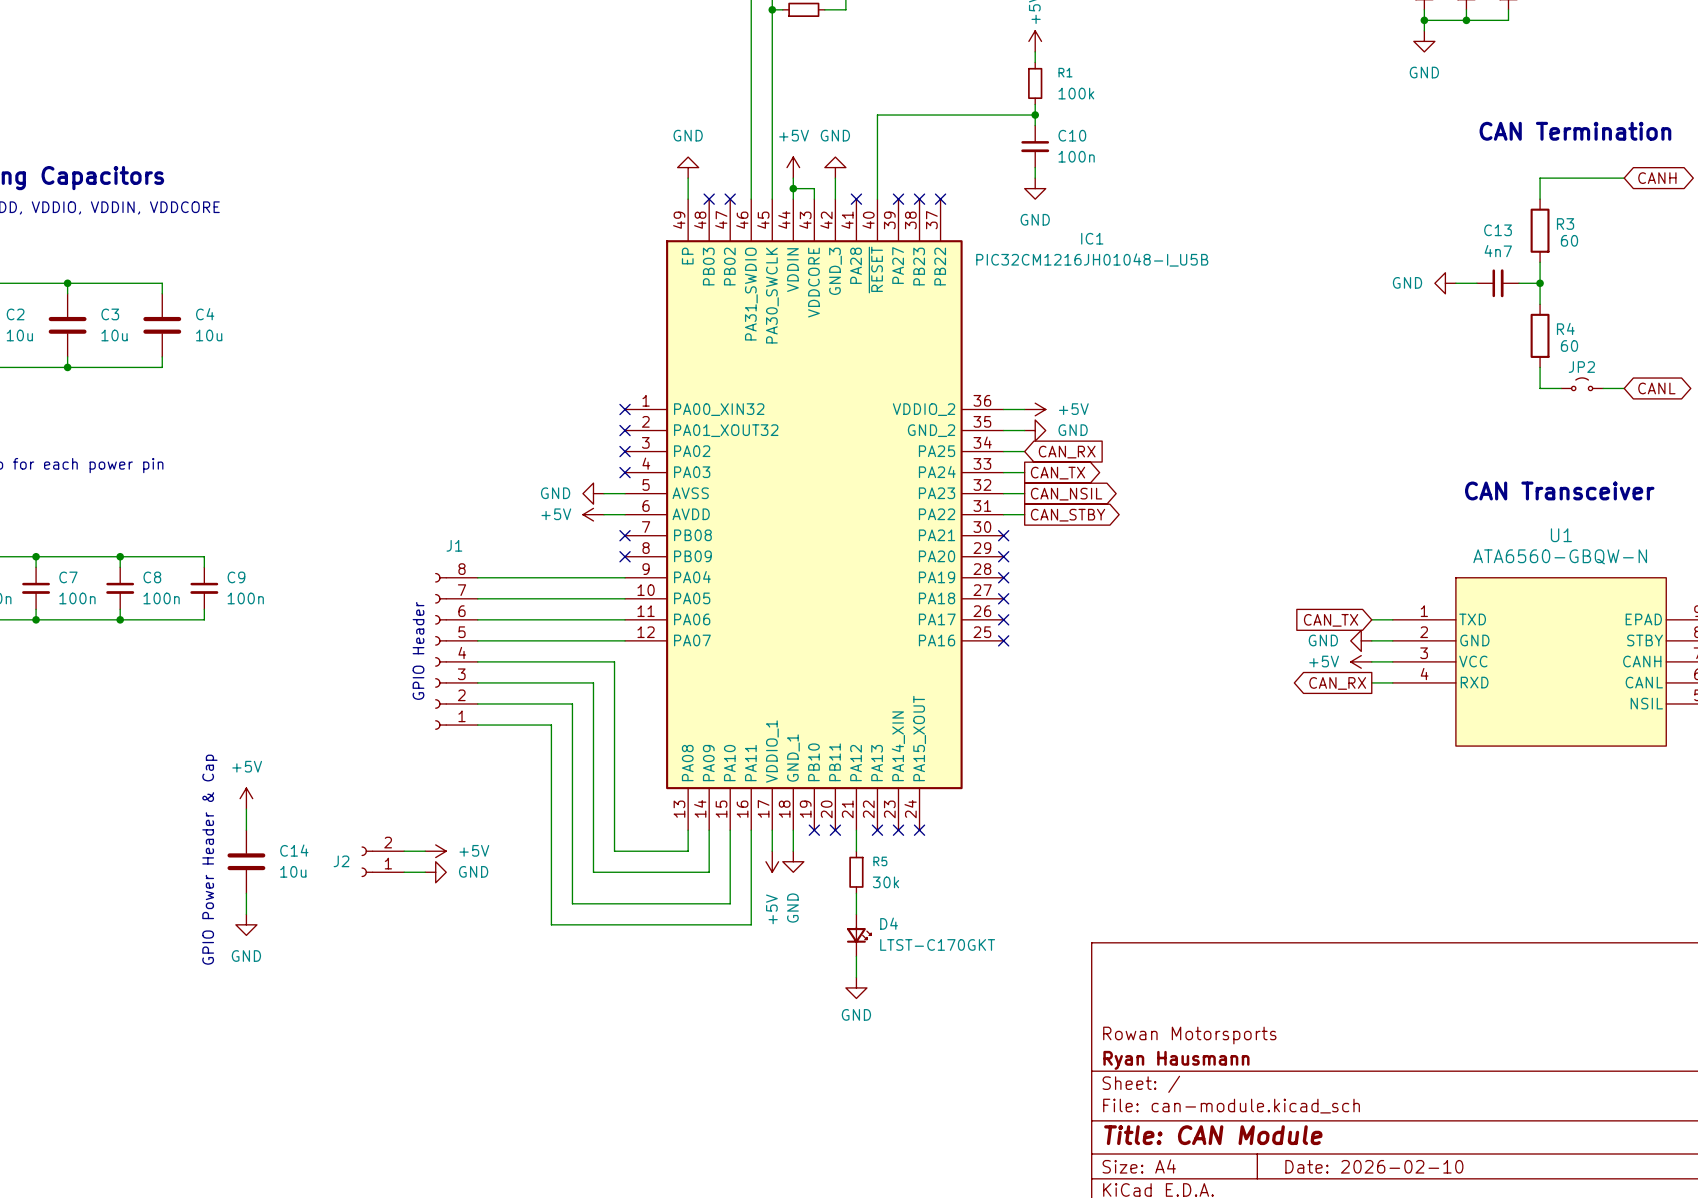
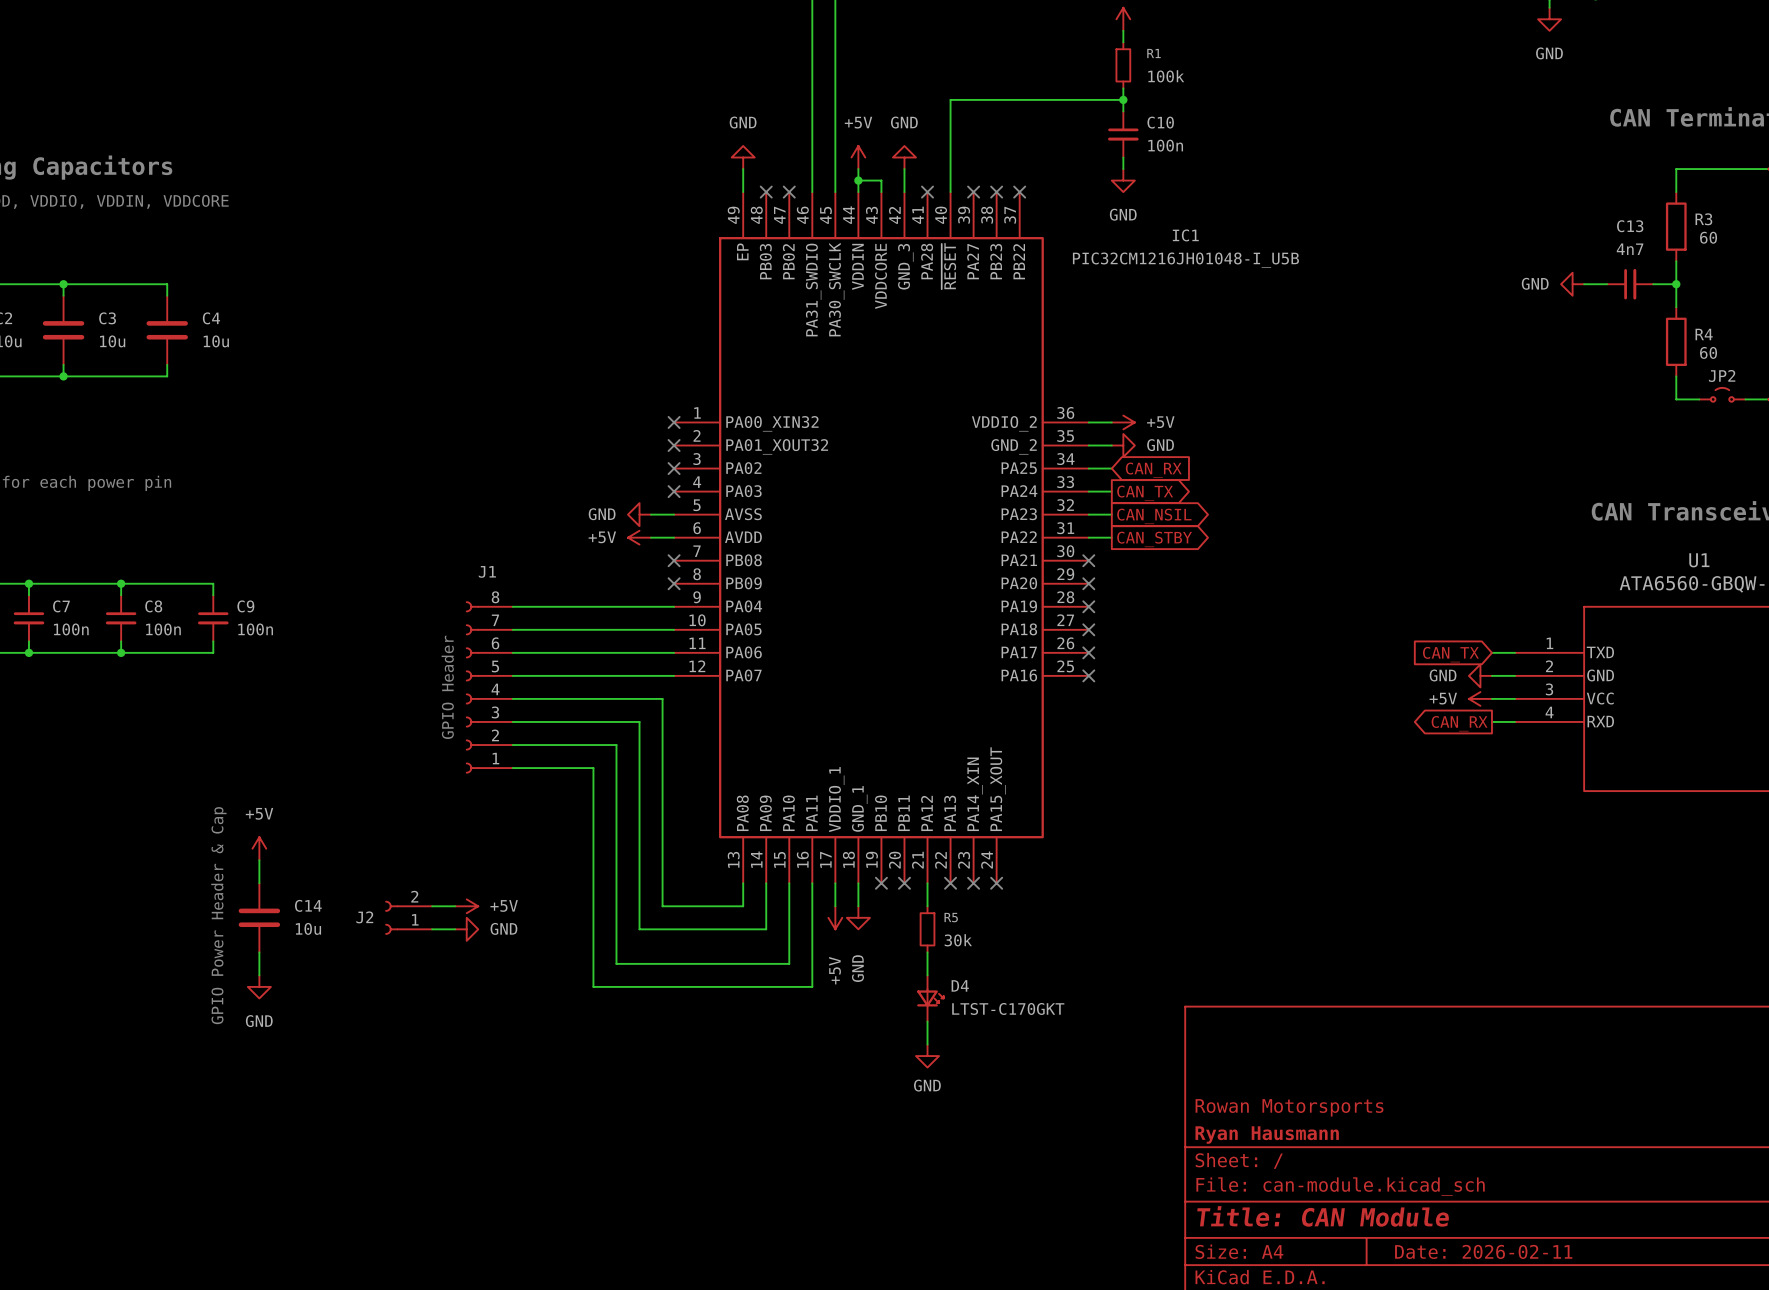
title block: Date: 2026-02-10 (1374, 1166) -> Date: 2026-02-11 (1483, 1251)

